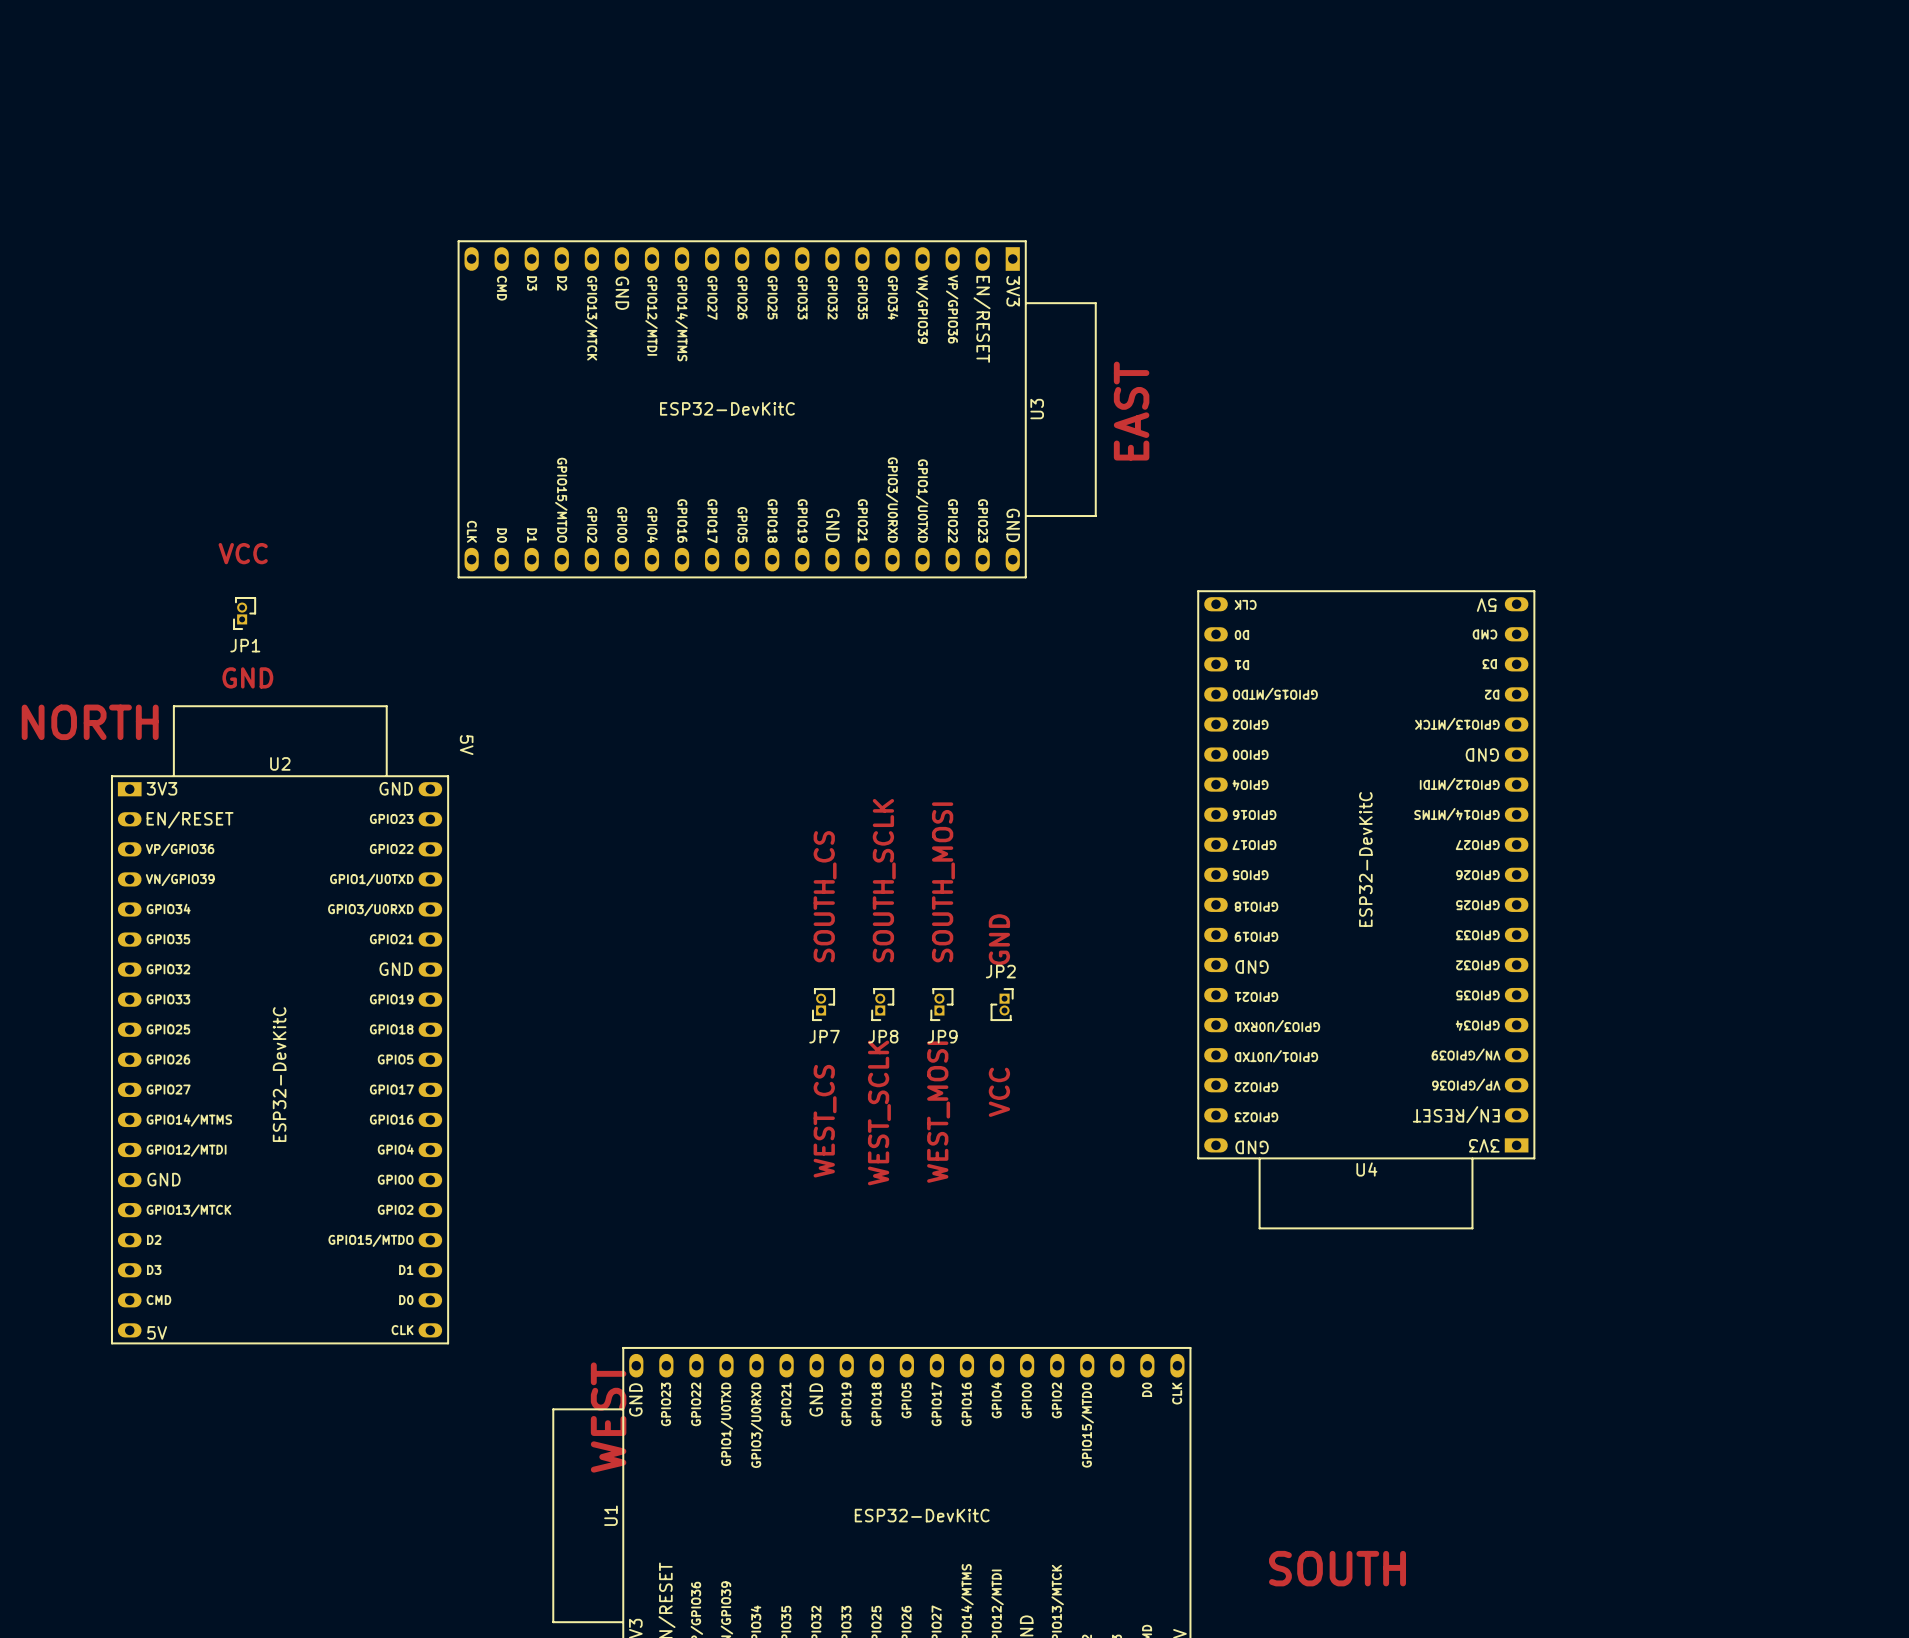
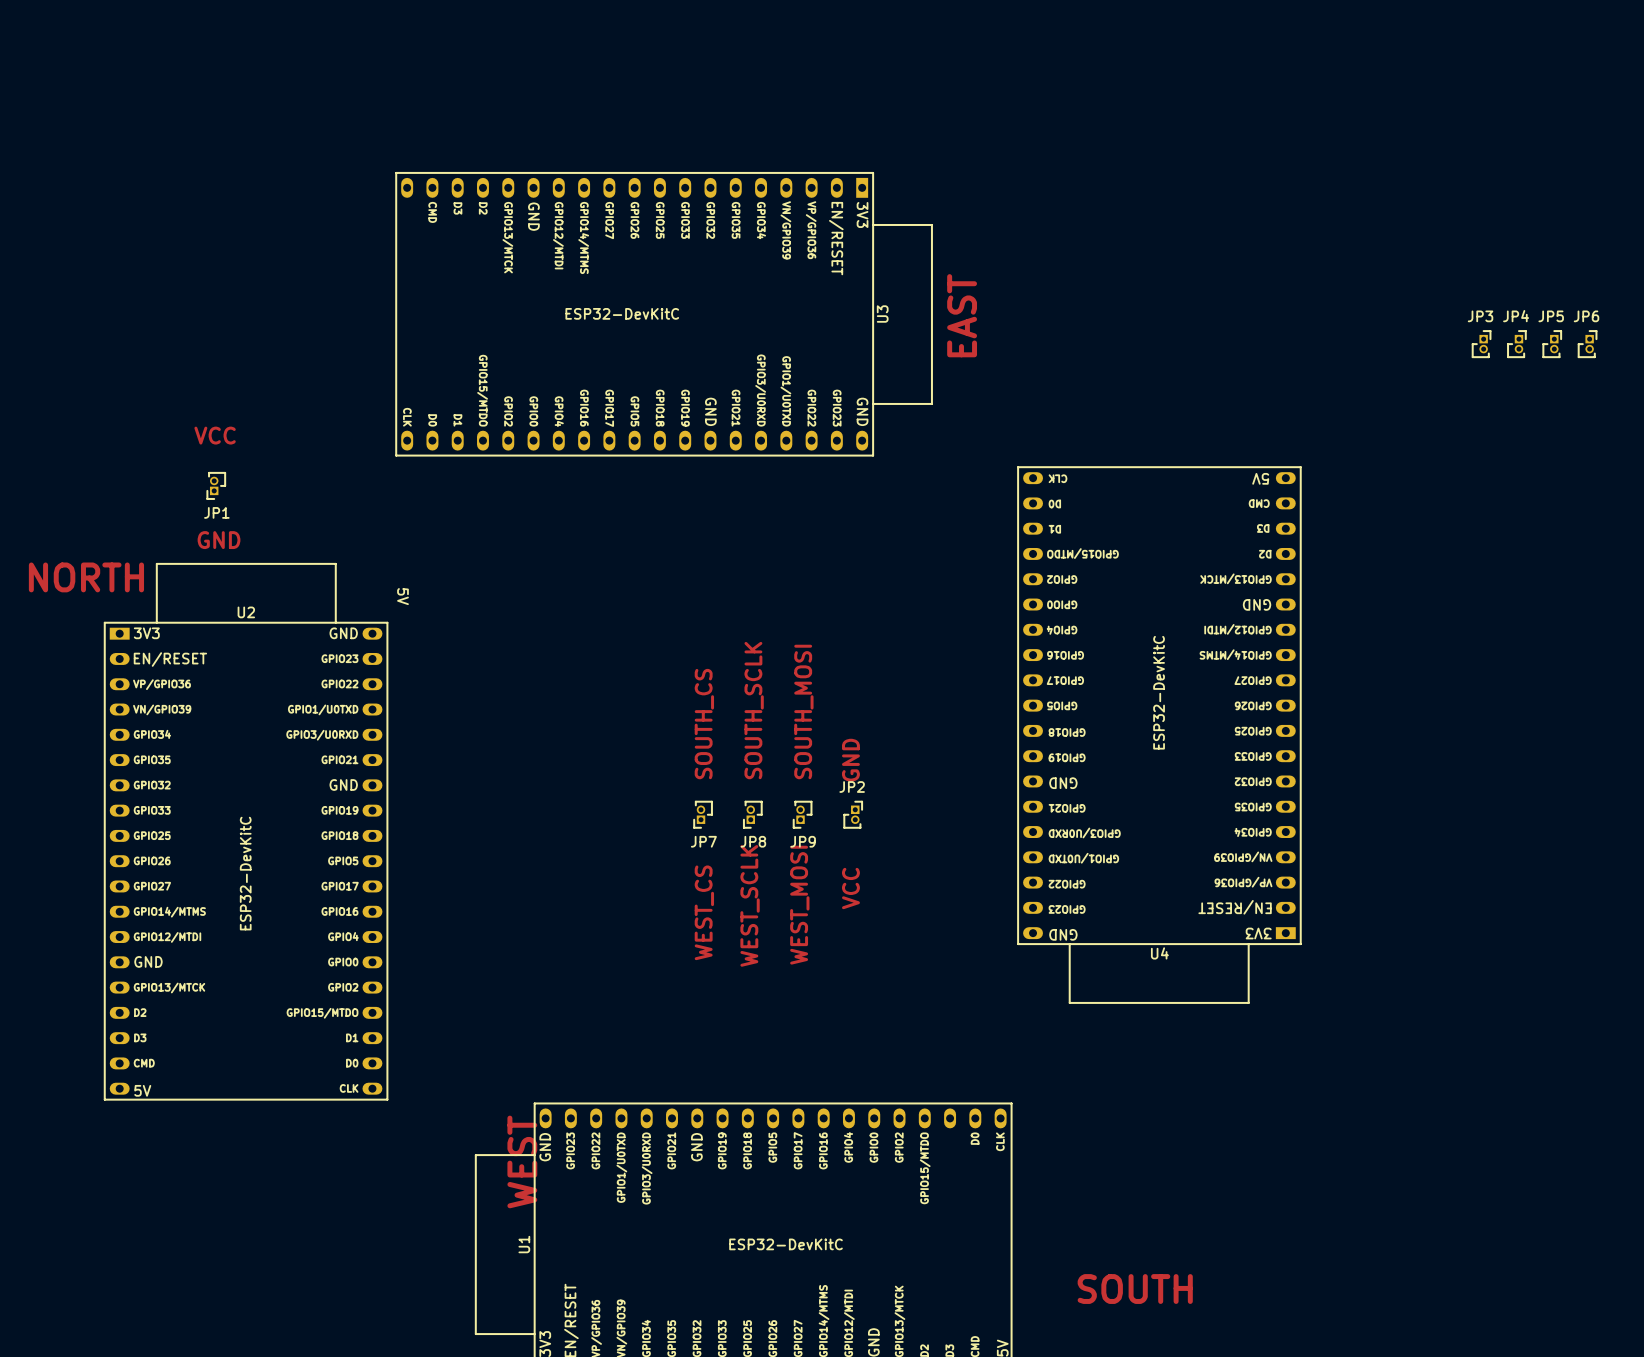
JP3: none -> (1481, 344)
JP4: none -> (1516, 344)
JP5: none -> (1552, 344)
JP6: none -> (1587, 344)

